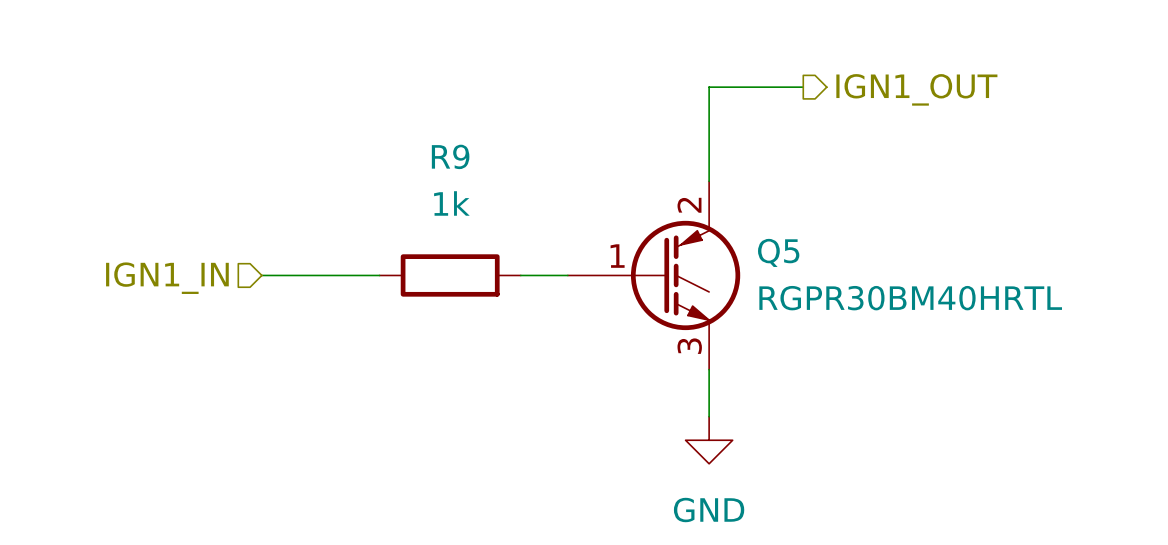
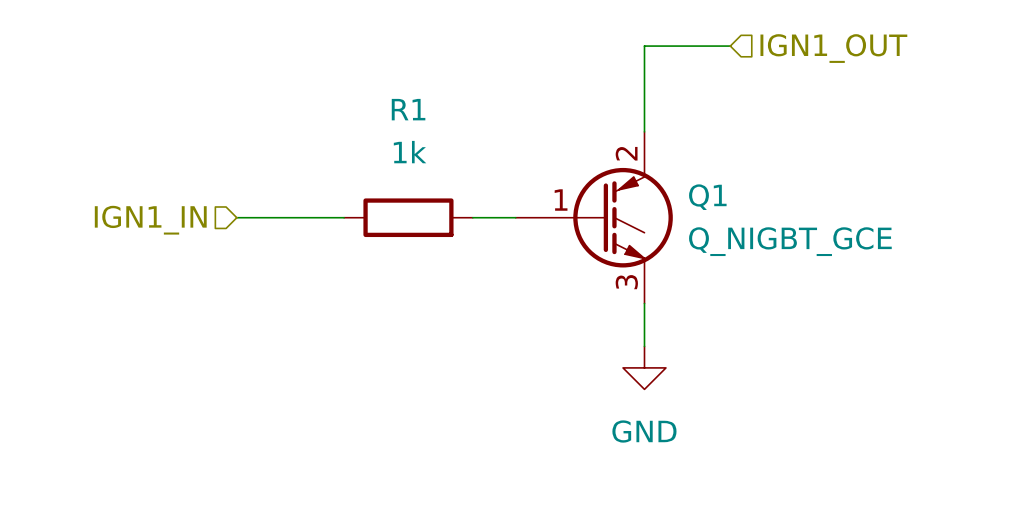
hierarchical label shape: output (916, 89) -> input (833, 48)
R9 name: R9 (450, 156) -> R1 (408, 109)
Q5 name: Q5 (778, 252) -> Q1 (707, 197)
Q5 value: RGPR30BM40HRTL (910, 298) -> Q_NIGBT_GCE (790, 241)

